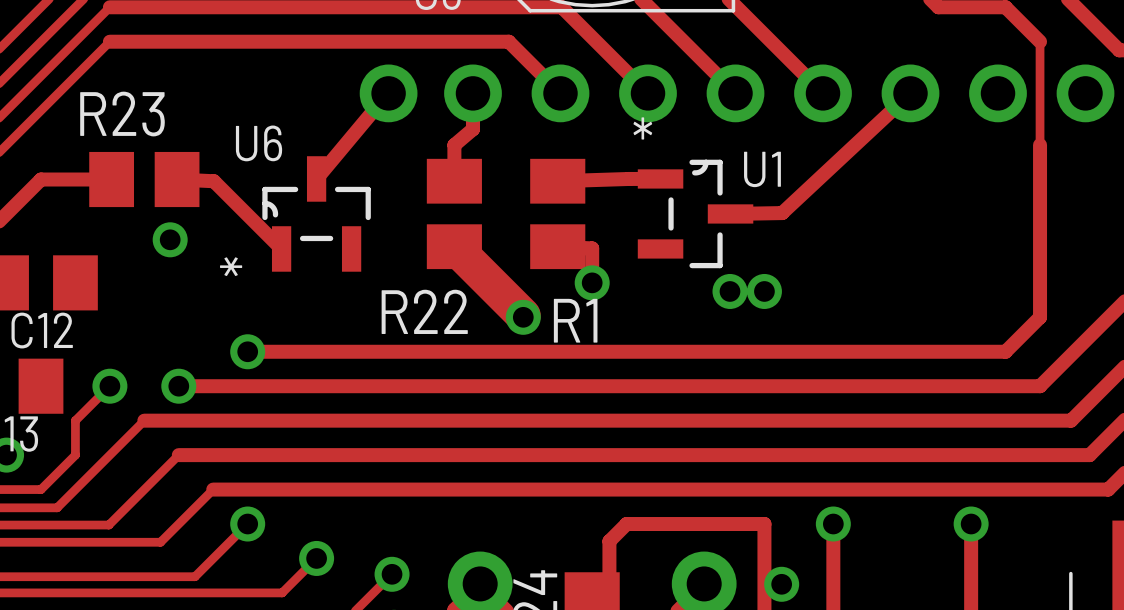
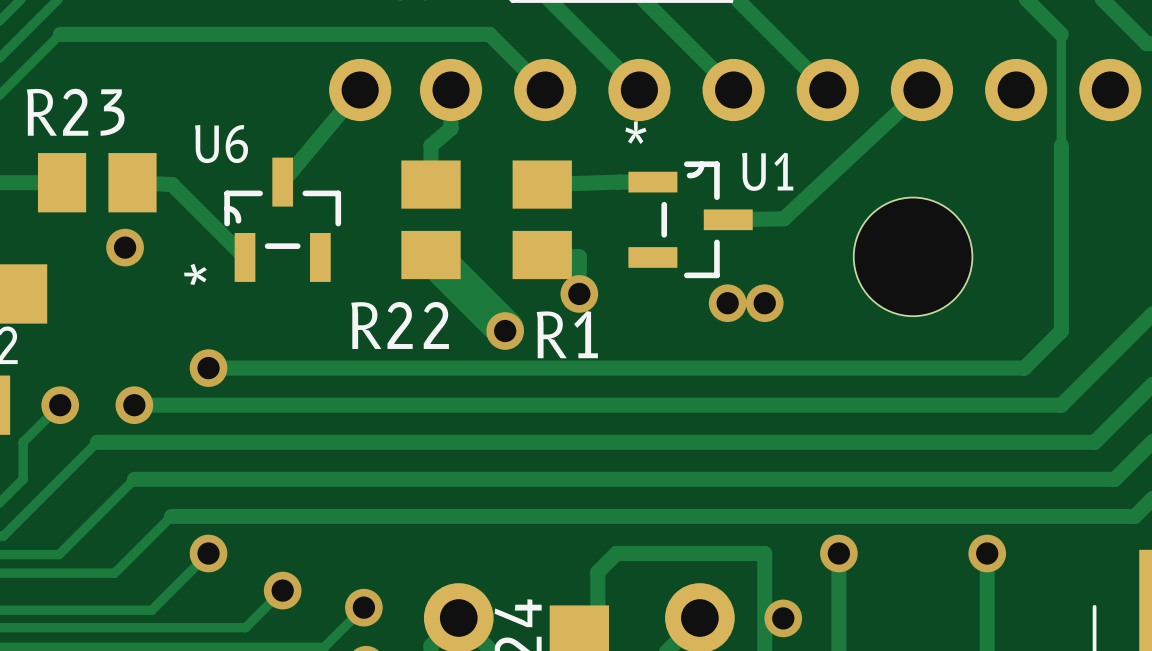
hole: none -> (913, 256)

